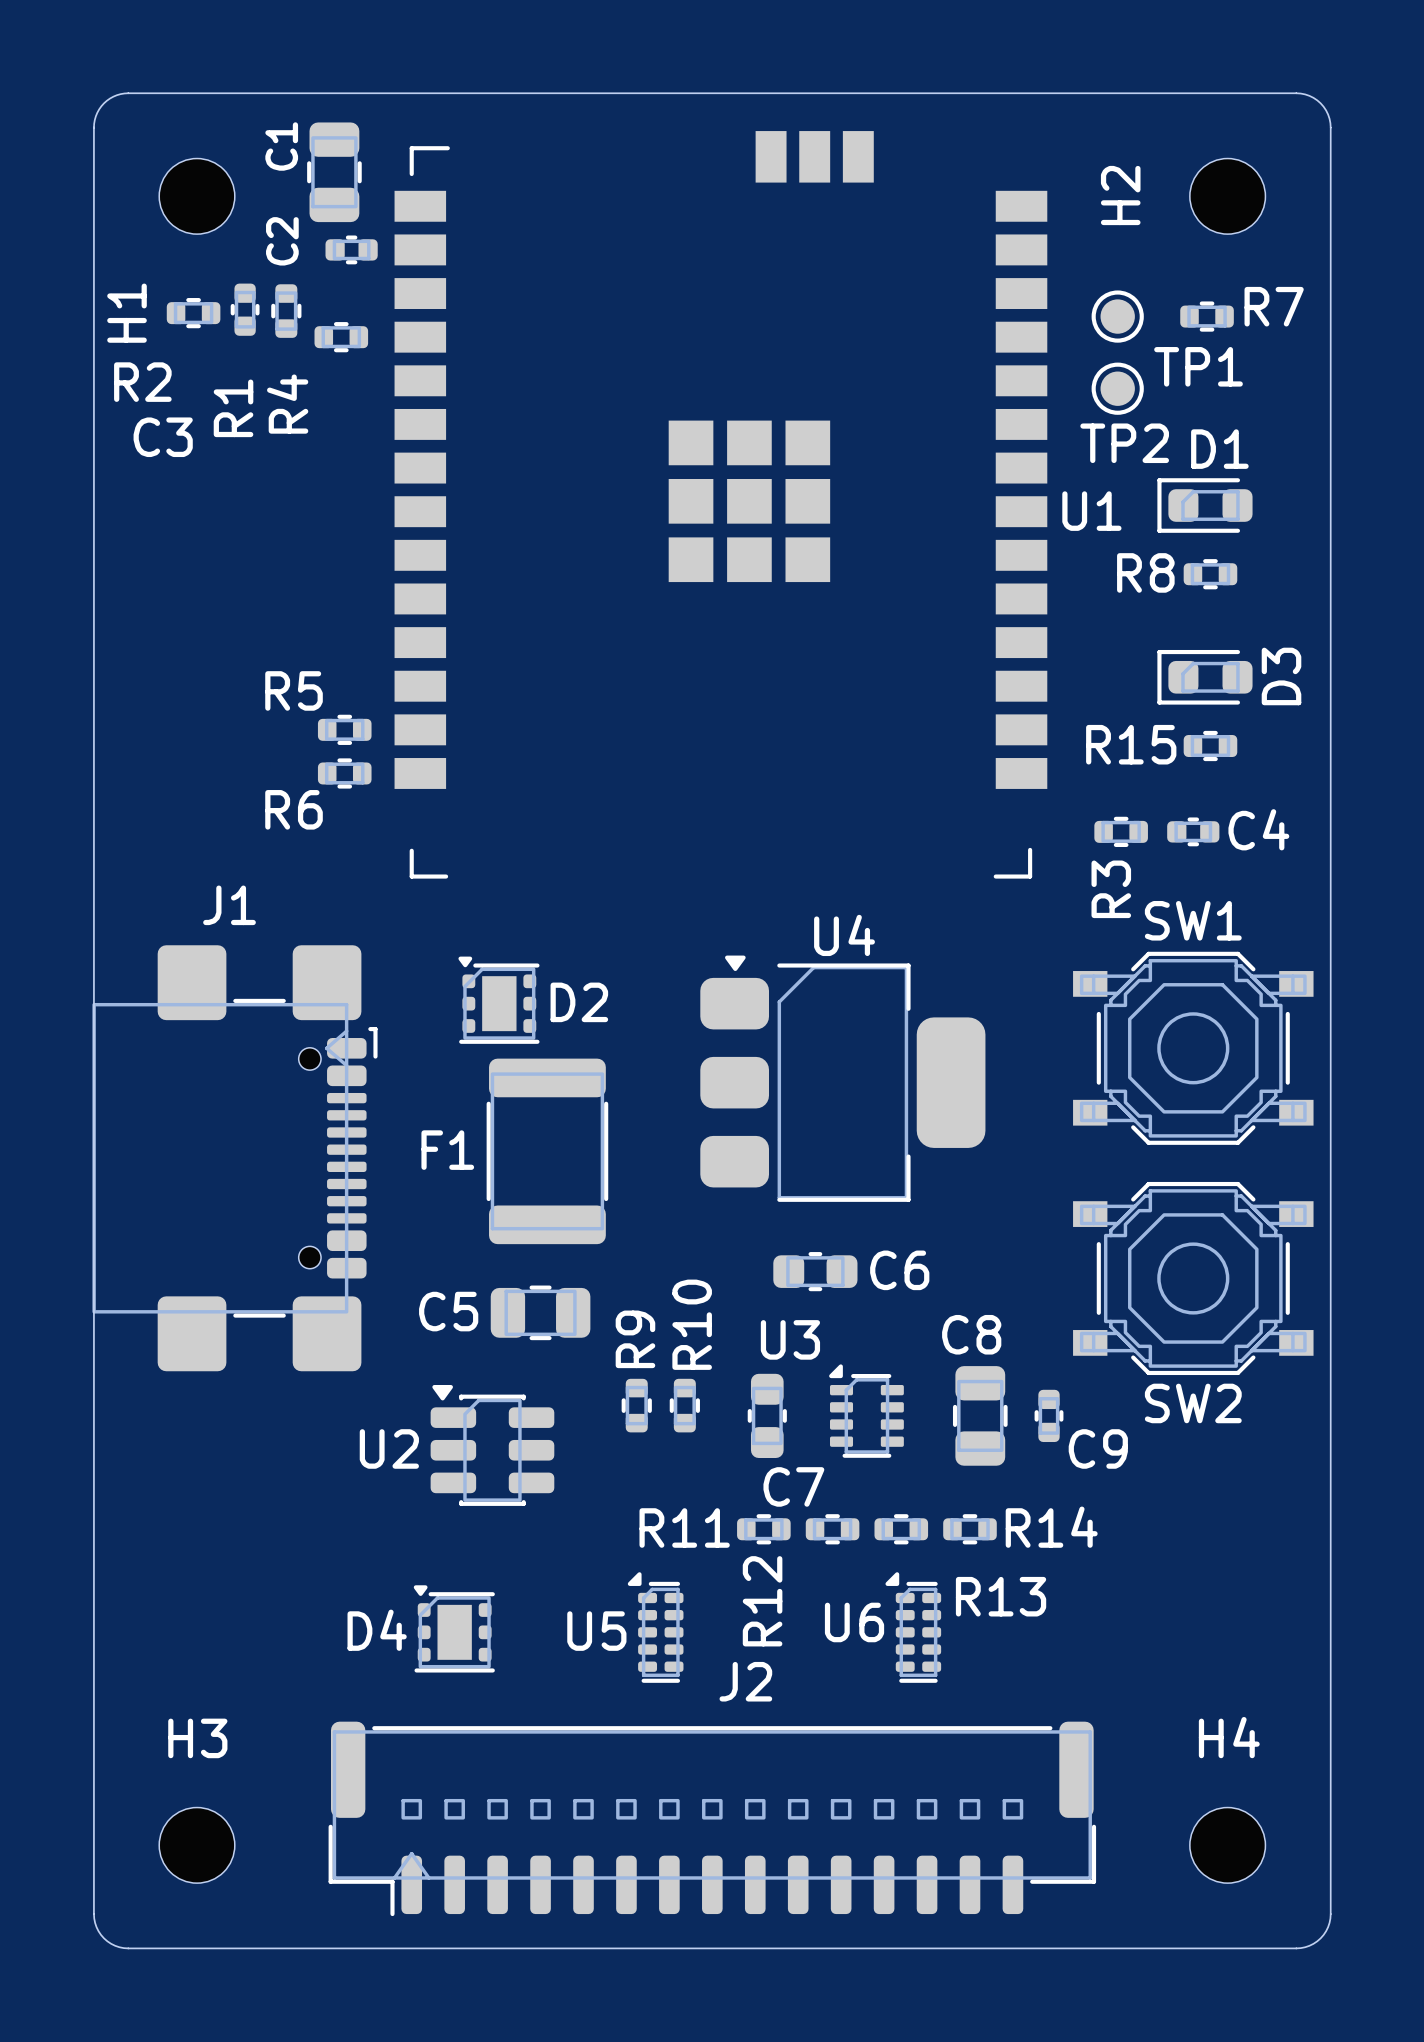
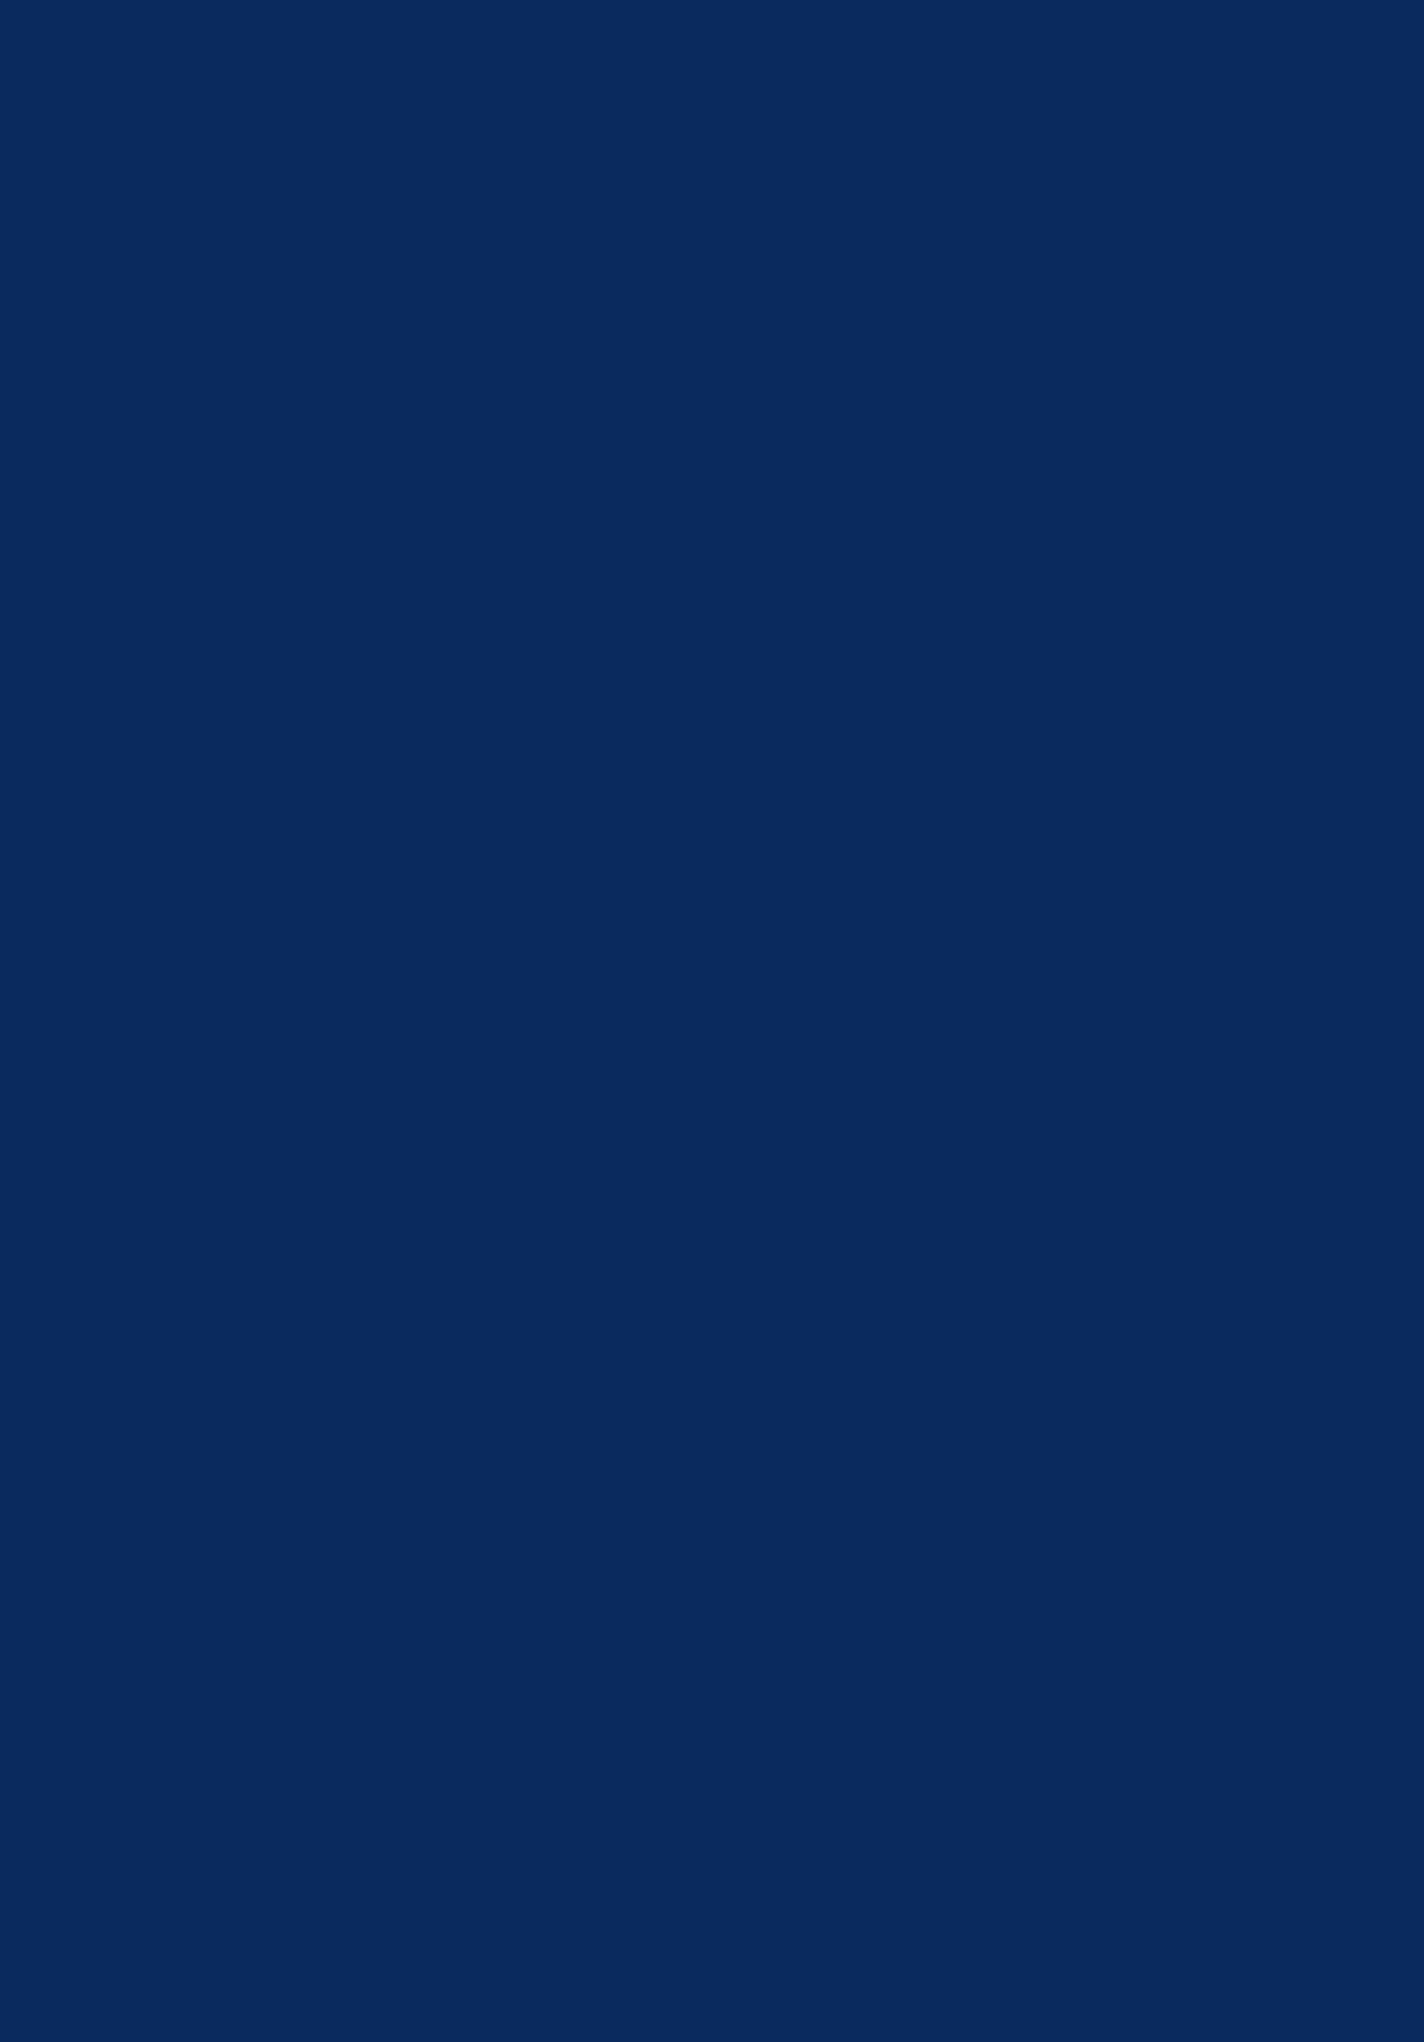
board edge: (128, 93) (1296, 93) (1313, 97) (1326, 110) (1330, 127) (1330, 1914) (1326, 1931) (1313, 1943) (1296, 1948) (128, 1948) (111, 1943) (98, 1931) (93, 1914) (93, 127) (95, 116) (104, 103) (113, 96) (128, 93) -> none
C1: (334, 172) -> none
H1: (197, 196) -> none
H2: (1227, 196) -> none
C2: (351, 249) -> none
C3: (245, 309) -> none
R1: (286, 311) -> none
R2: (193, 313) -> none
TP1: (1117, 316) -> none
R7: (1207, 316) -> none
R4: (341, 337) -> none
TP2: (1117, 388) -> none
U1: (720, 504) -> none
D1: (1204, 505) -> none
R8: (1210, 574) -> none
D3: (1204, 677) -> none
R5: (344, 729) -> none
R15: (1210, 745) -> none
R6: (344, 773) -> none
R3: (1121, 831) -> none
C4: (1193, 831) -> none
D2: (498, 1000) -> none
SW1: (1193, 1048) -> none
U4: (842, 1078) -> none
F1: (547, 1151) -> none
J1: (234, 1158) -> none
C6: (815, 1271) -> none
SW2: (1193, 1278) -> none
C5: (540, 1312) -> none
R9: (636, 1405) -> none
R10: (684, 1405) -> none
U3: (866, 1411) -> none
C7: (767, 1415) -> none
C8: (980, 1415) -> none
C9: (1049, 1415) -> none
U2: (492, 1445) -> none
R11: (763, 1529) -> none
R12: (832, 1529) -> none
R13: (901, 1529) -> none
R14: (969, 1529) -> none
U5: (655, 1627) -> none
U6: (913, 1627) -> none
D4: (454, 1628) -> none
J2: (712, 1818) -> none
H3: (197, 1845) -> none
H4: (1227, 1845) -> none

